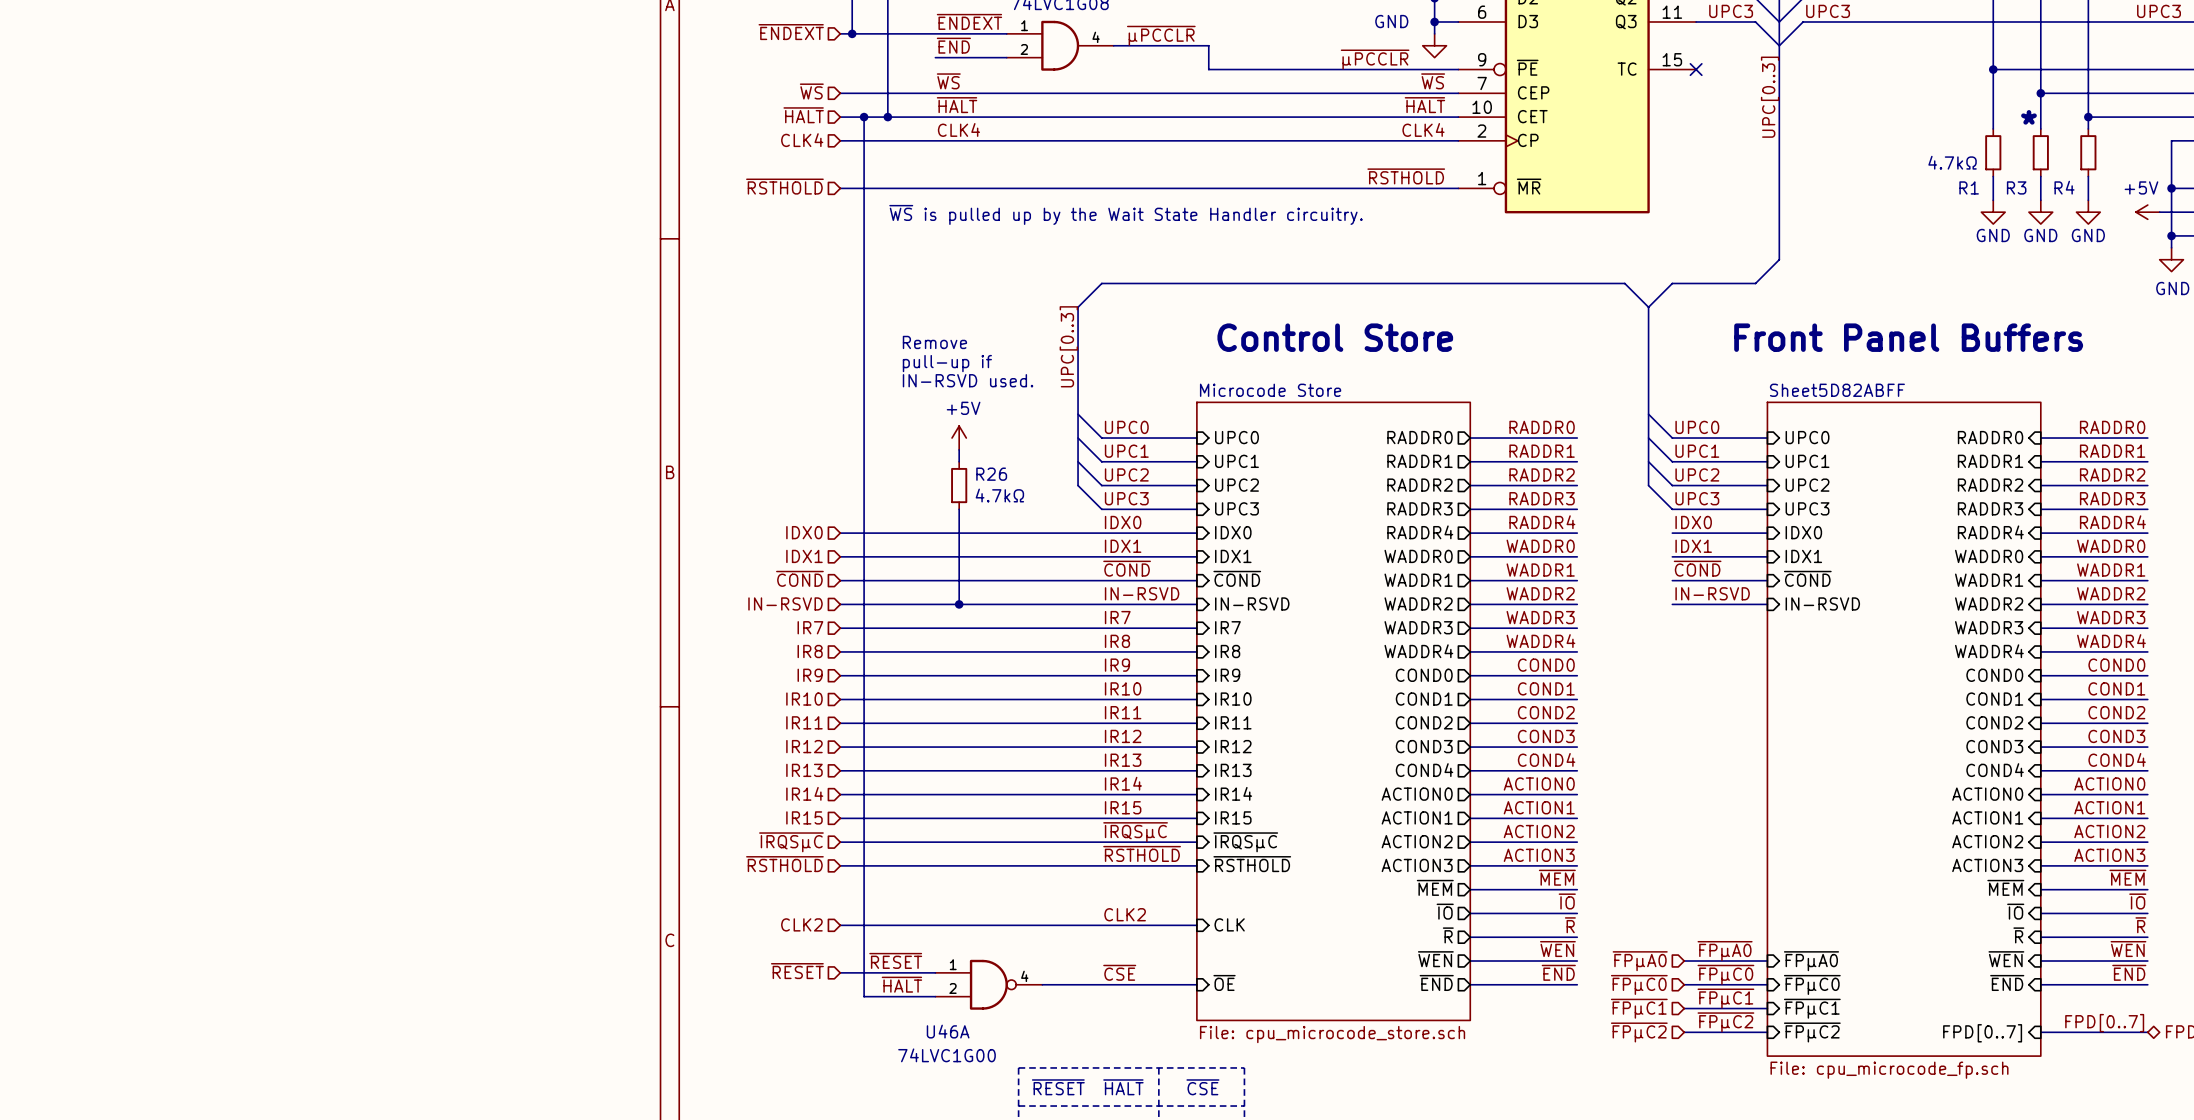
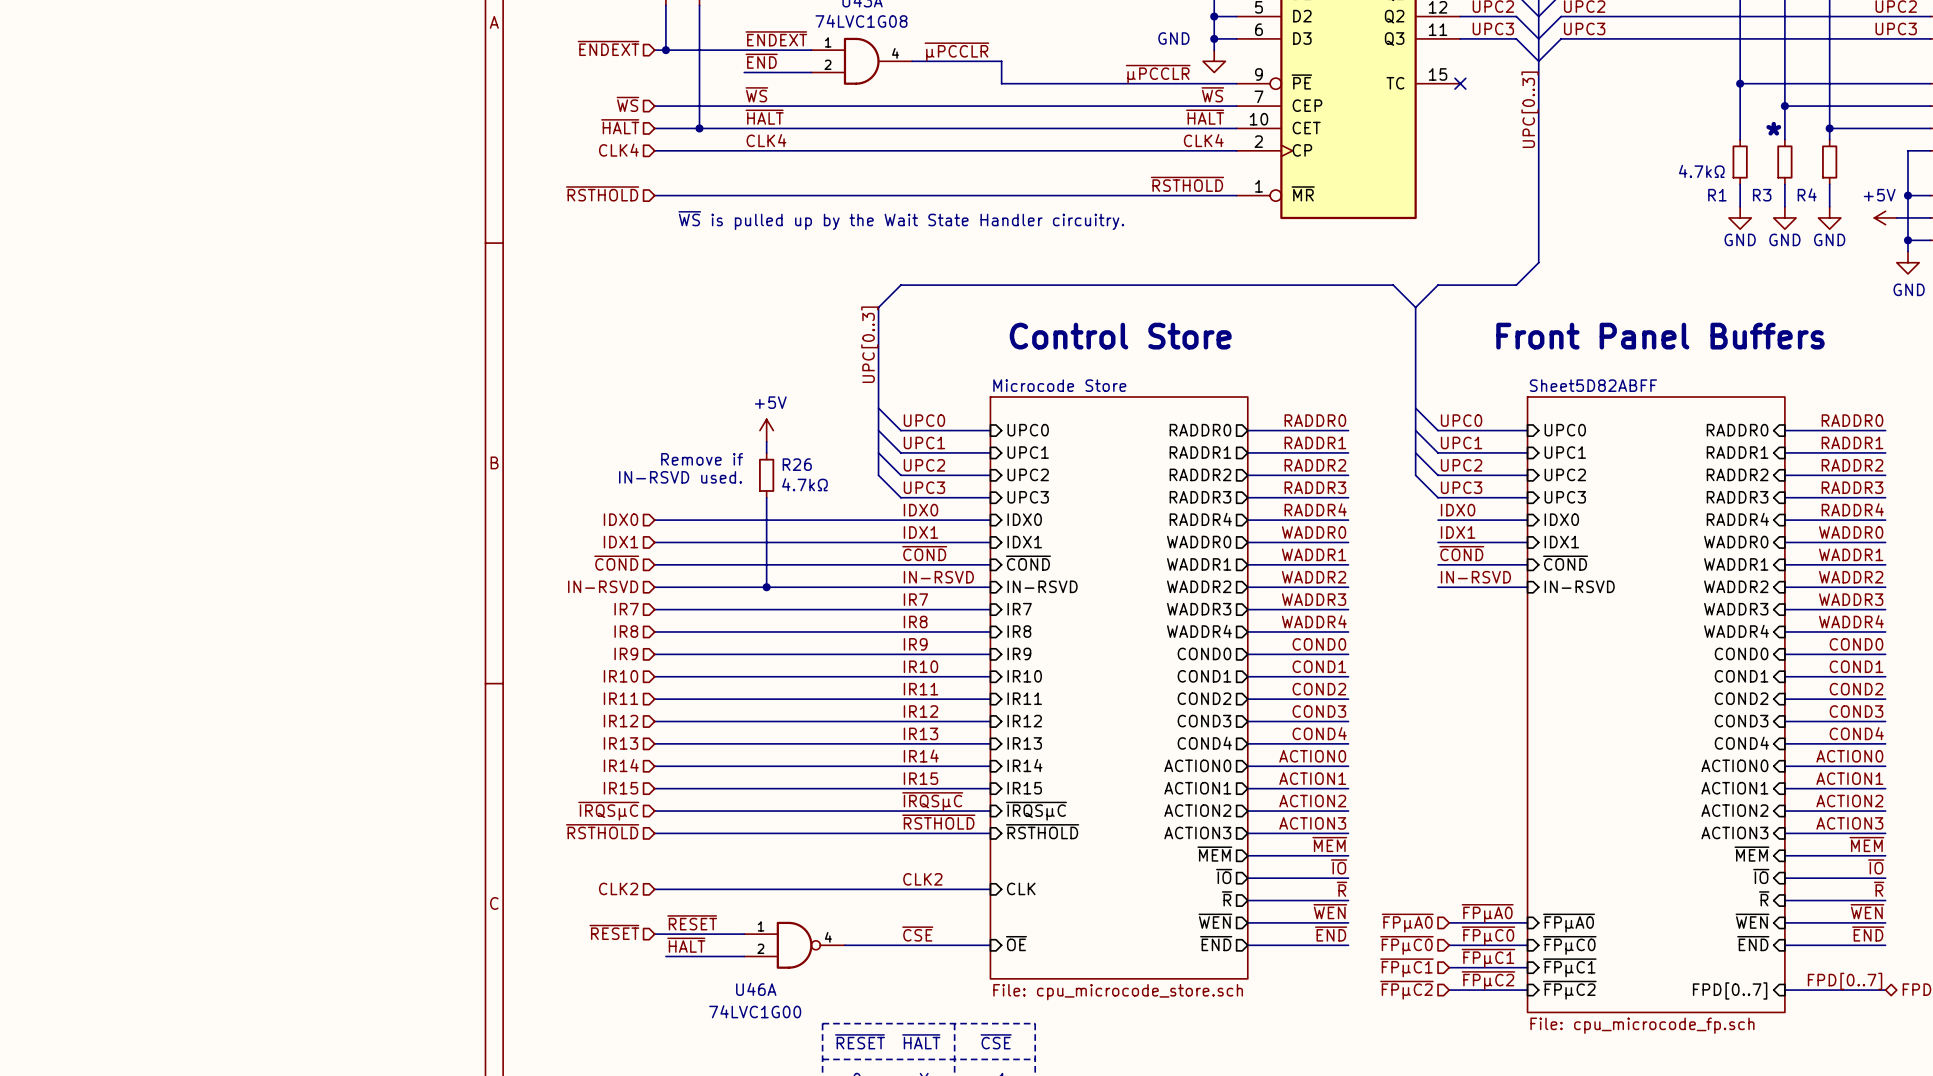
wire: (864, 117) (864, 996) -> (665, 956) (677, 956)
junction: (864, 117) -> none
text position: ~{WS} is pulled up by the Wait State Handler circuitry. (1125, 214) -> ~{WS} is pulled up by the Wait State Handler circuitry. (901, 220)
text: Remove (934, 342) -> none
text: pull-up if (947, 363) -> none
text position: IN-RSVD used. (968, 380) -> IN-RSVD used. (680, 477)
text: none -> Remove if (702, 459)
label position: ~{RESET} (895, 960) -> ~{RESET} (692, 922)
label position: ~{HALT} (901, 984) -> ~{HALT} (686, 945)

